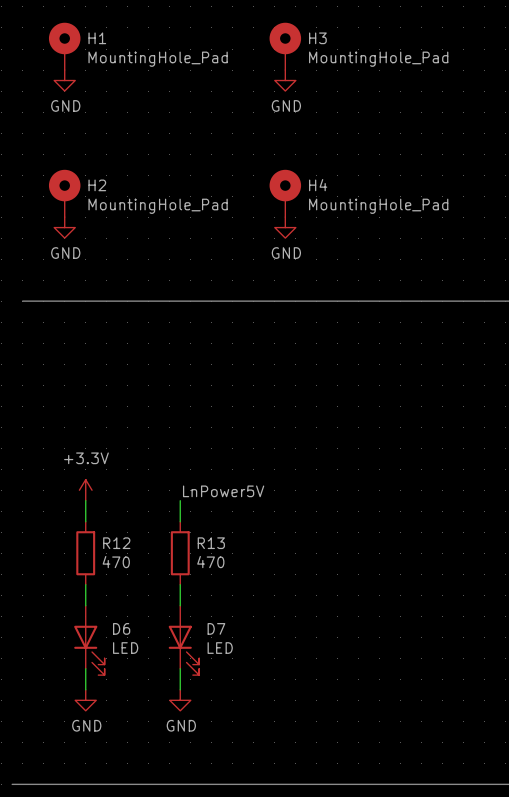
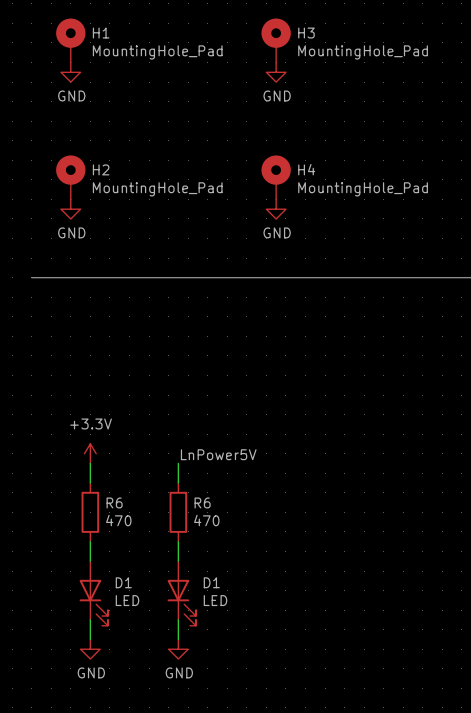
R12 name: R12 (116, 543) -> R6 (114, 502)
R13 name: R13 (211, 543) -> R6 (202, 502)
D6 name: D6 (121, 628) -> D1 (123, 582)
D7 name: D7 (216, 628) -> D1 (211, 582)

